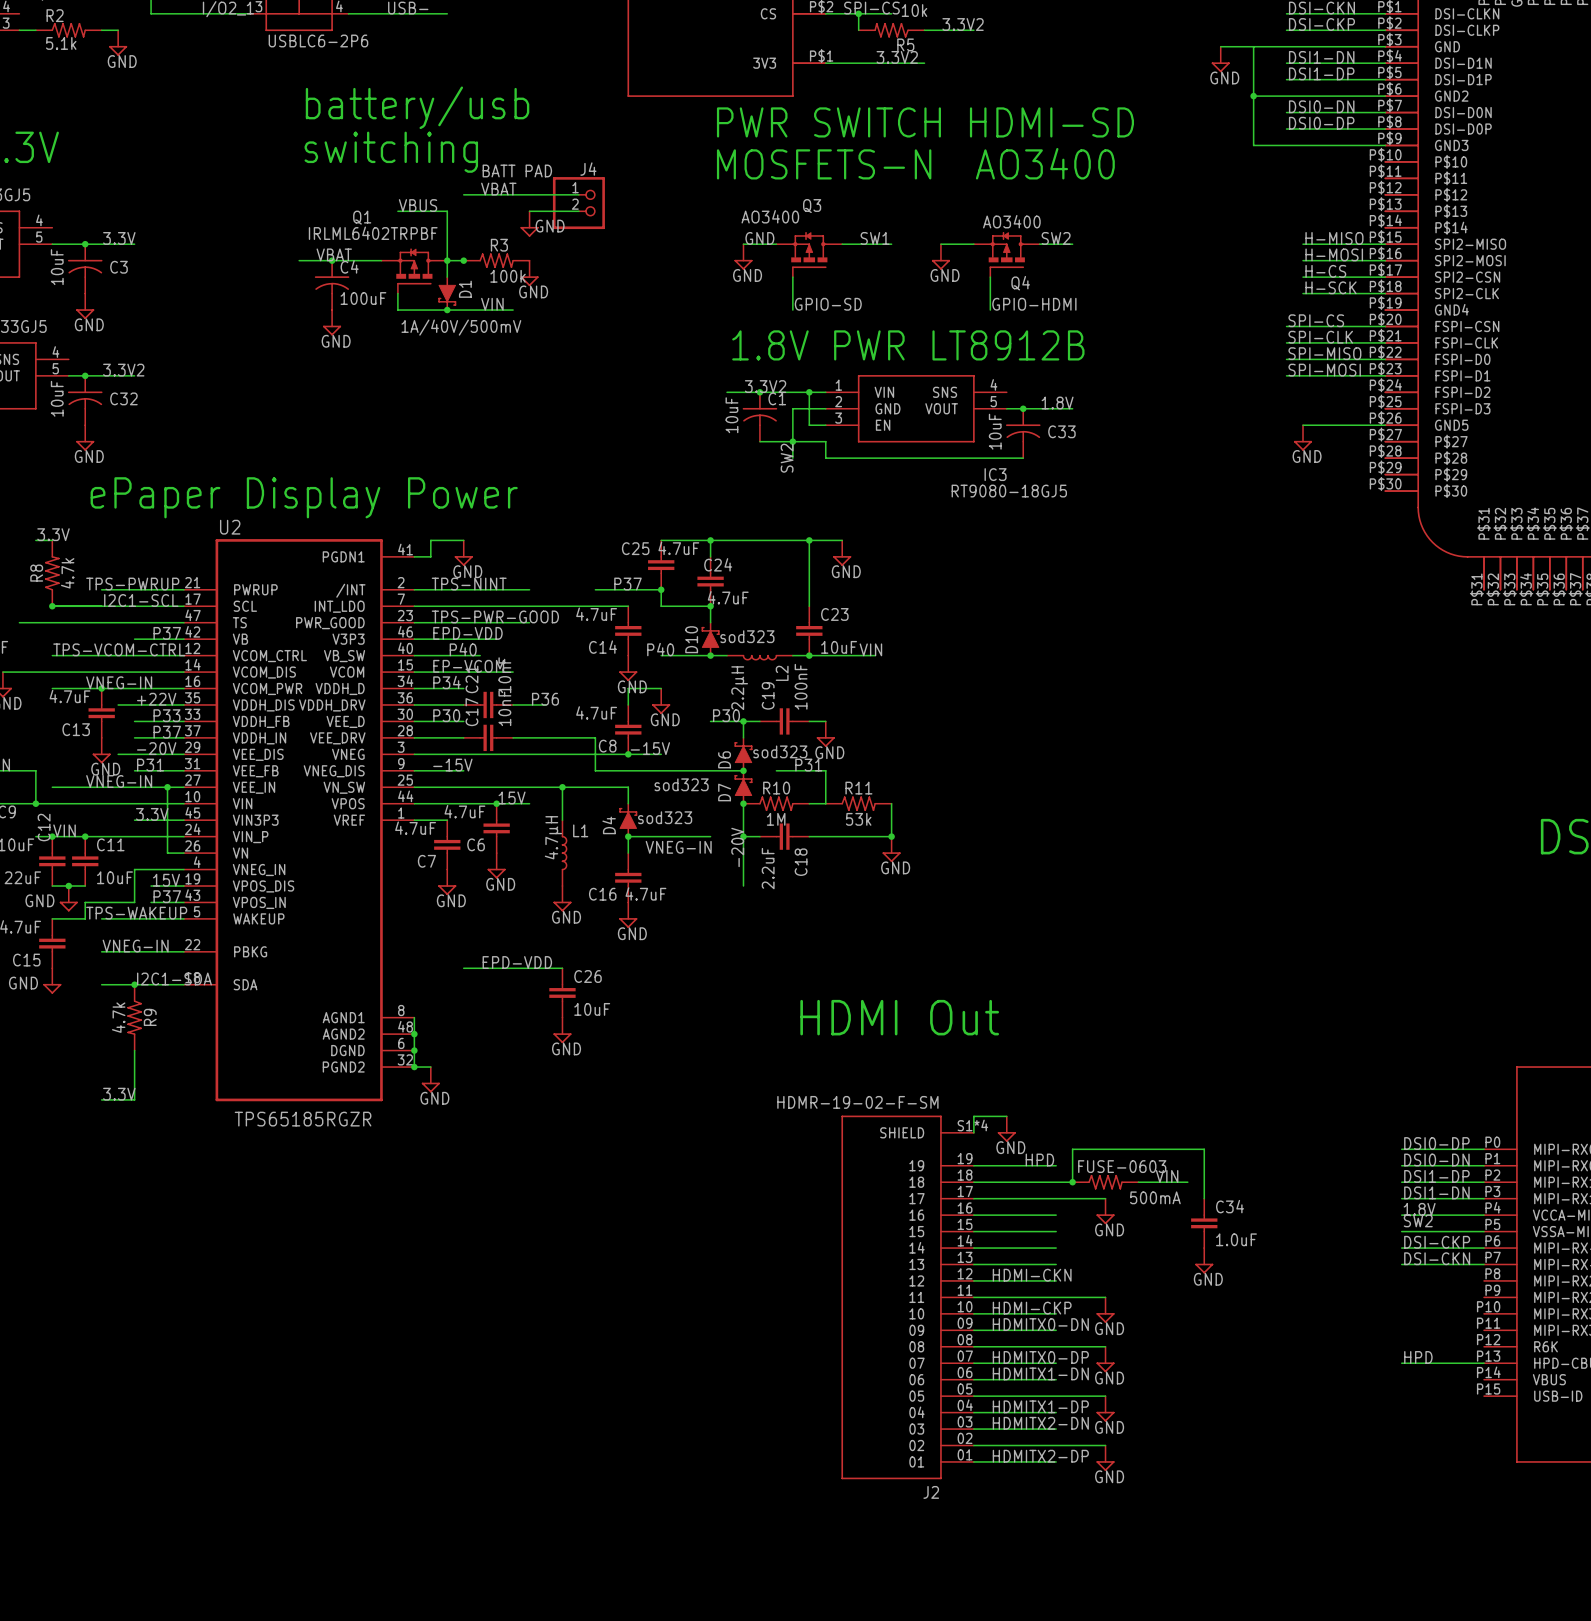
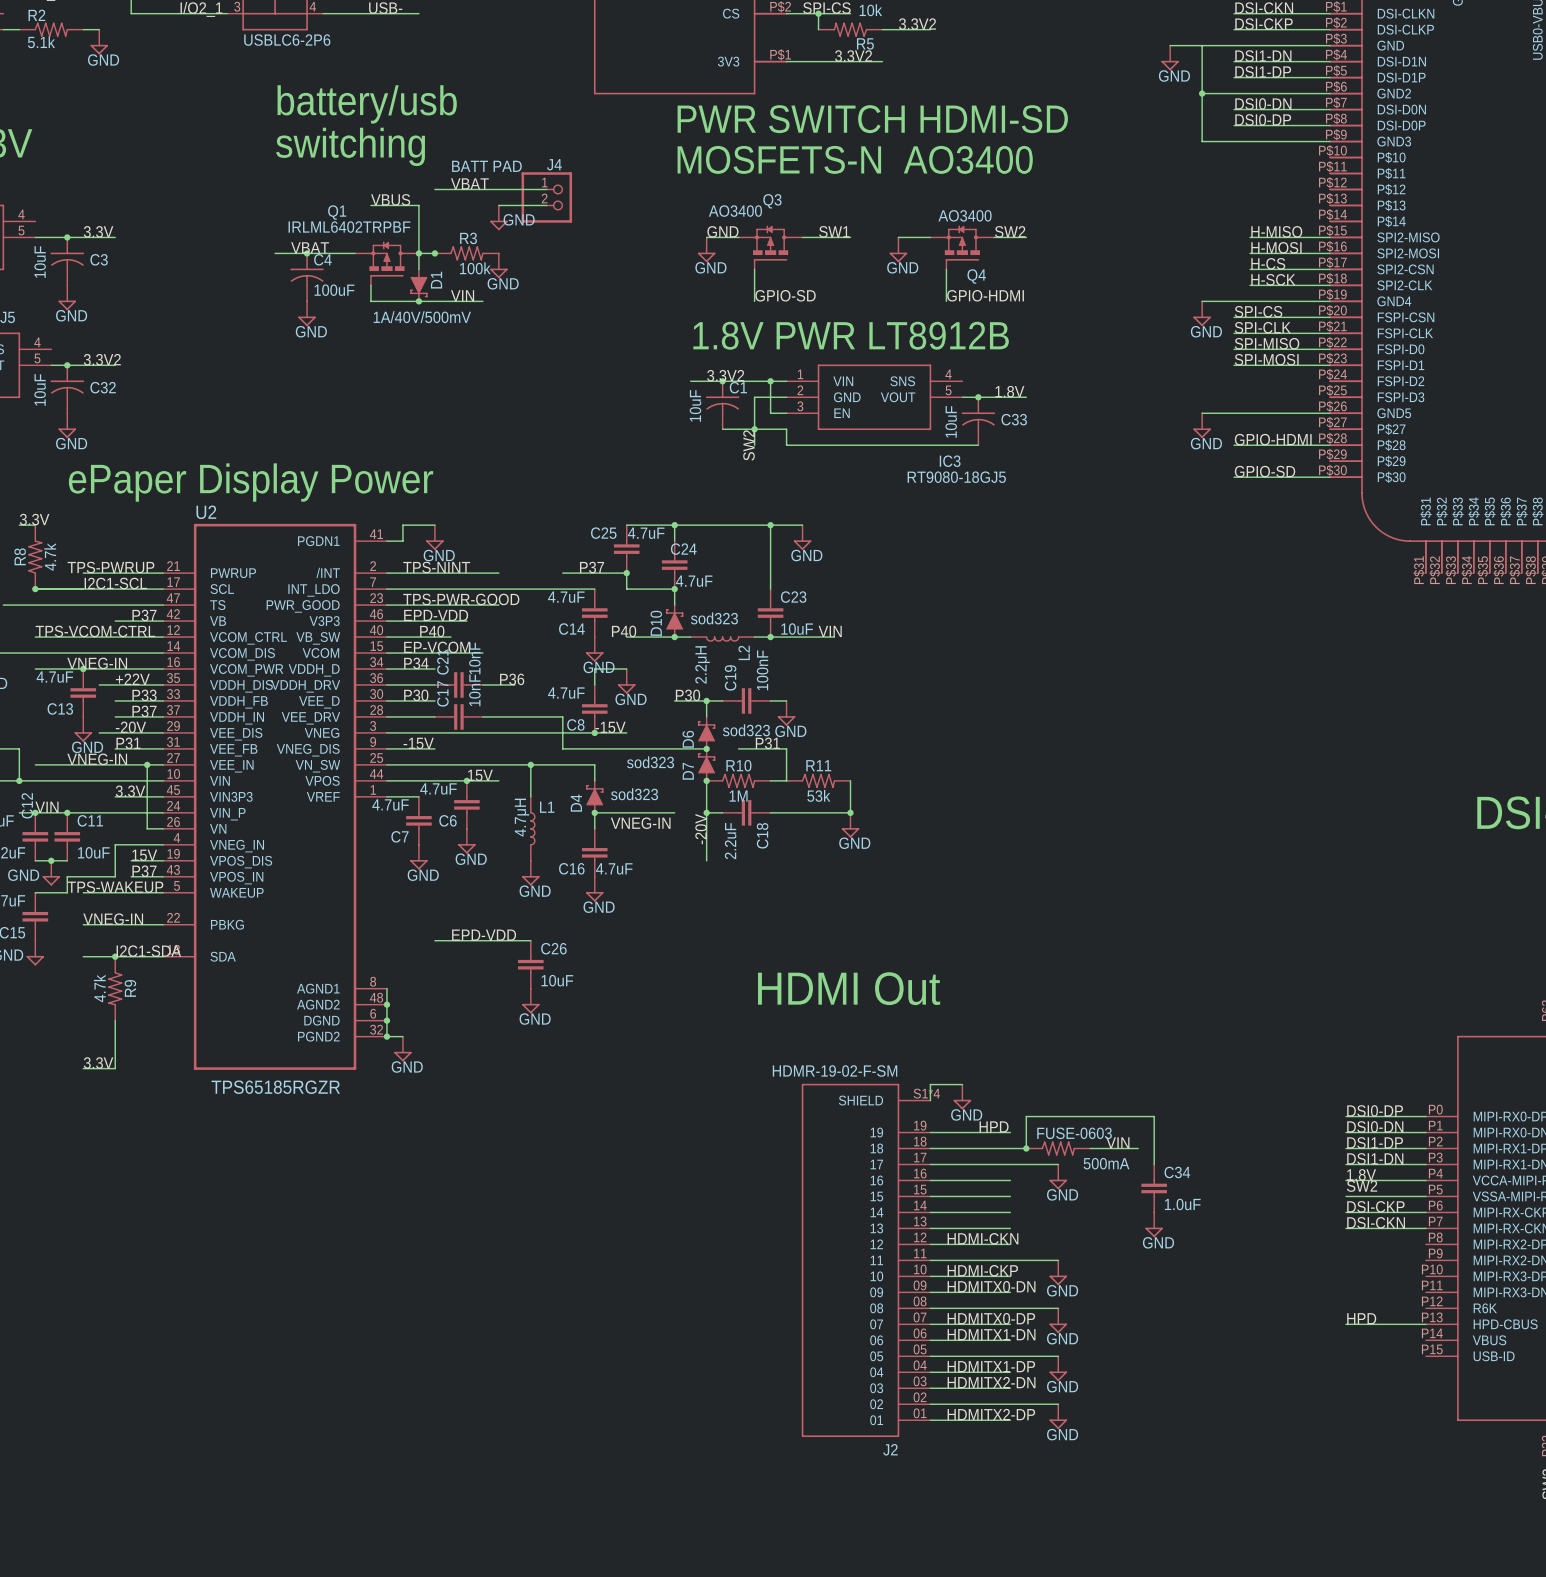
wire: none -> (1202, 301) (1330, 301)
power symbol: none -> GND (1202, 313)
wire: none -> (1202, 413) (1250, 413)
power symbol position: GND (1303, 437) -> GND (1202, 425)
label: none -> GPIO-HDMI (1273, 439)
wire: none -> (1234, 445) (1330, 445)
label: none -> GPIO-SD (1265, 471)
wire: none -> (1234, 477) (1330, 477)

